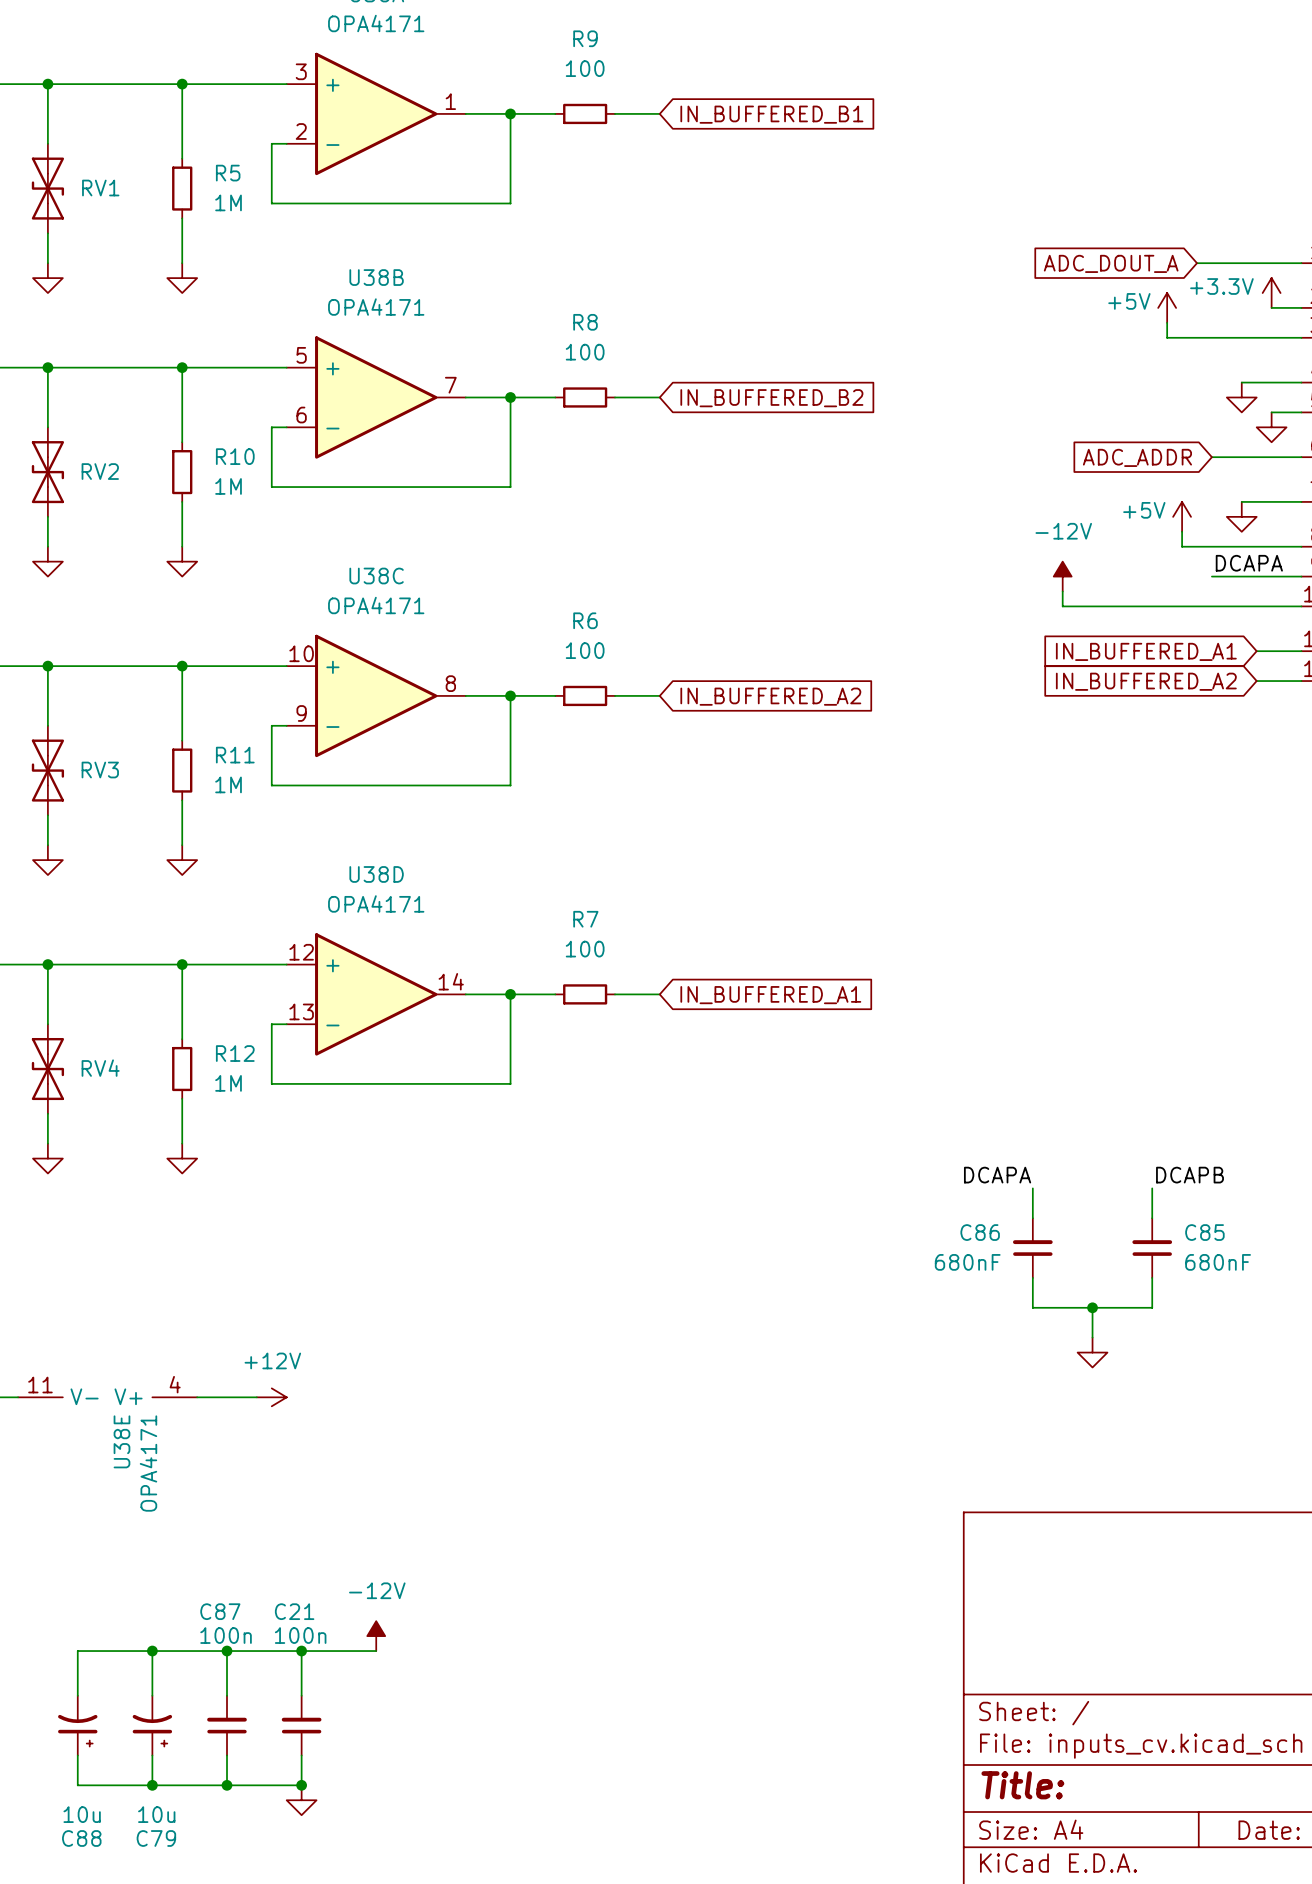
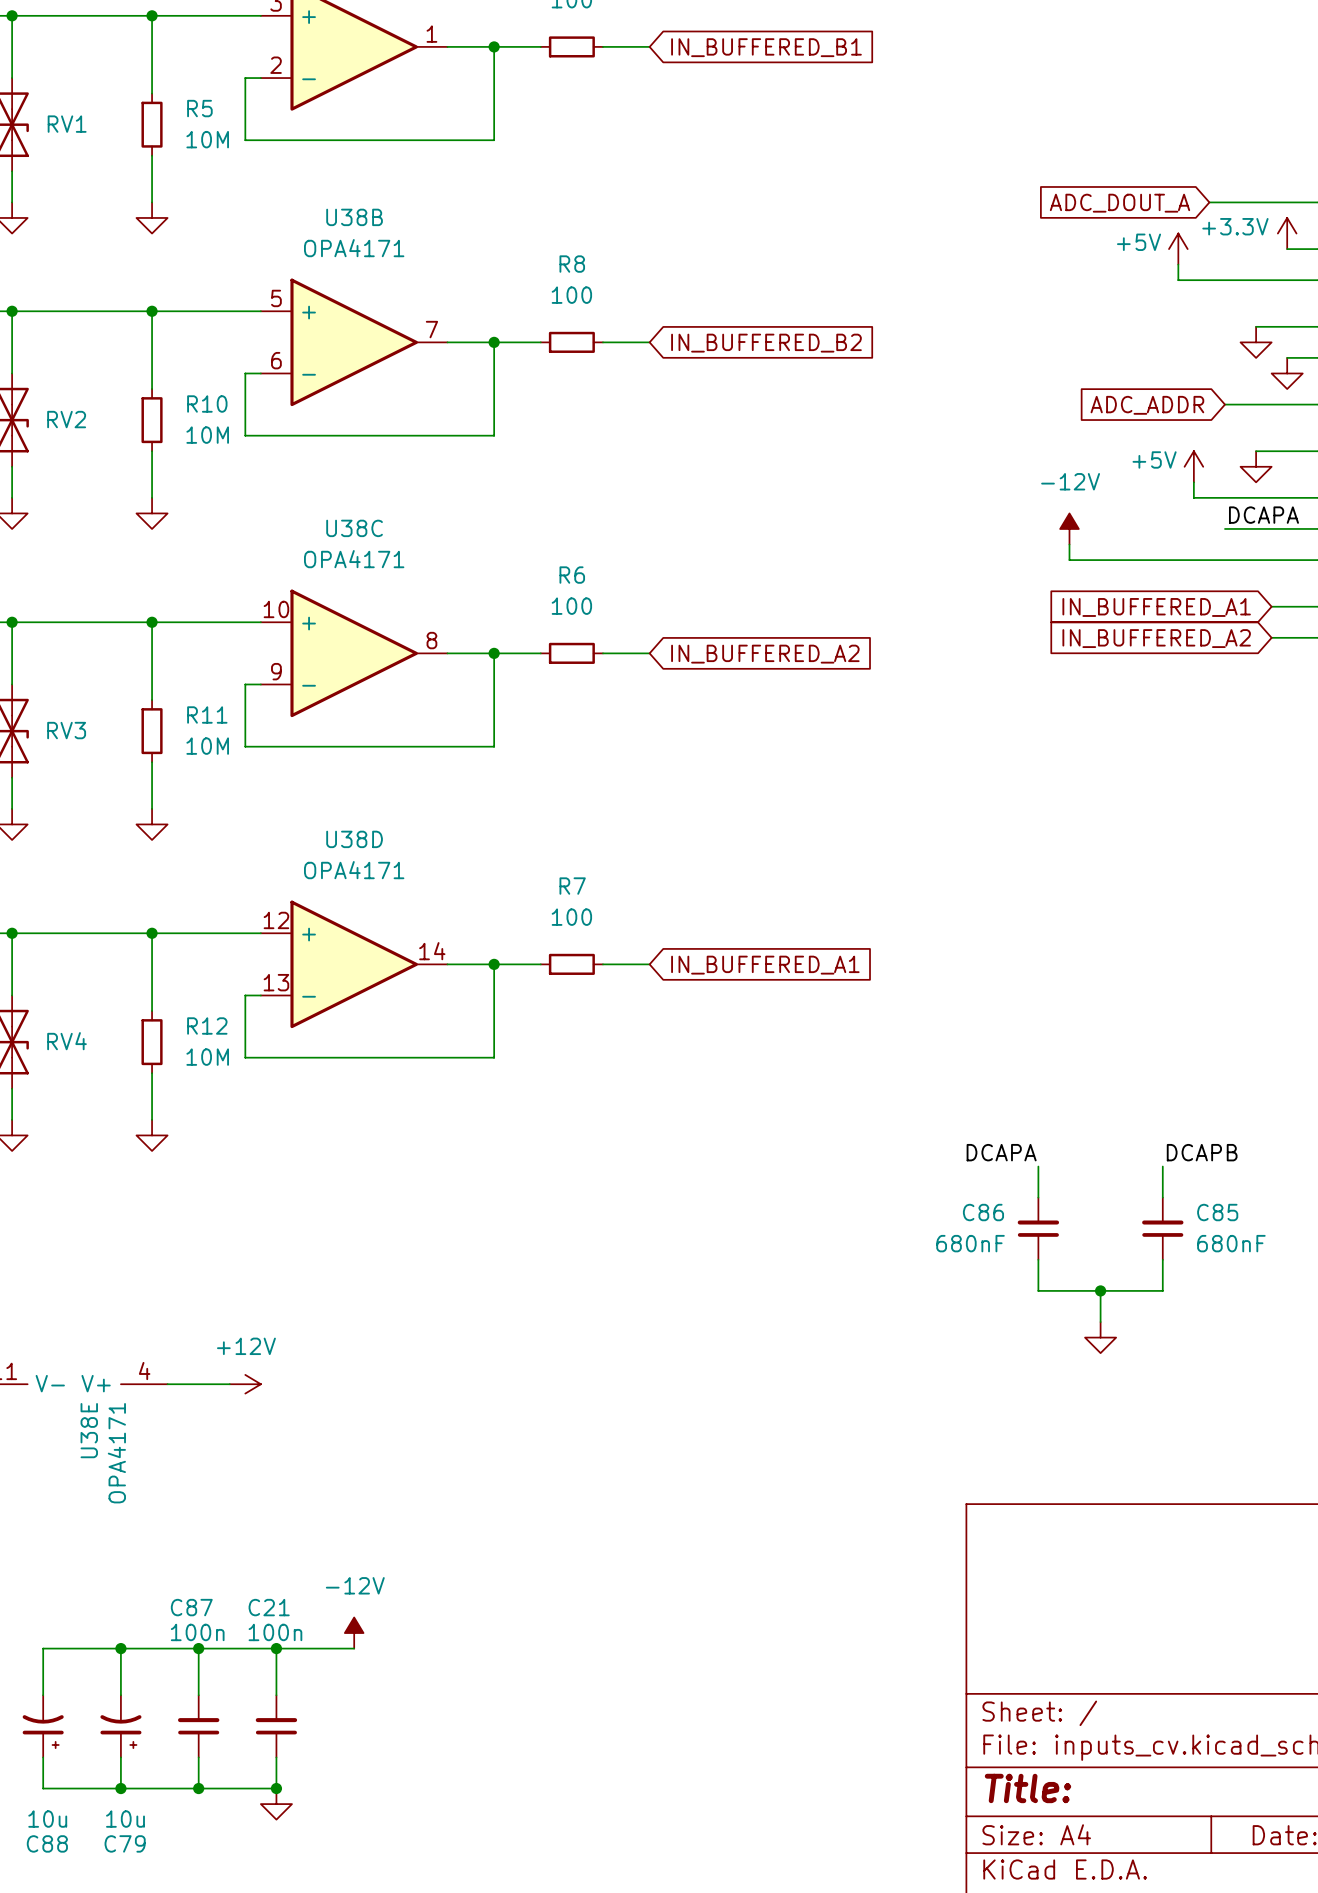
R5 value: 1M (228, 202) -> 10M (207, 139)
R10 value: 1M (228, 486) -> 10M (207, 435)
R11 value: 1M (228, 784) -> 10M (207, 746)
R12 value: 1M (228, 1083) -> 10M (207, 1057)

